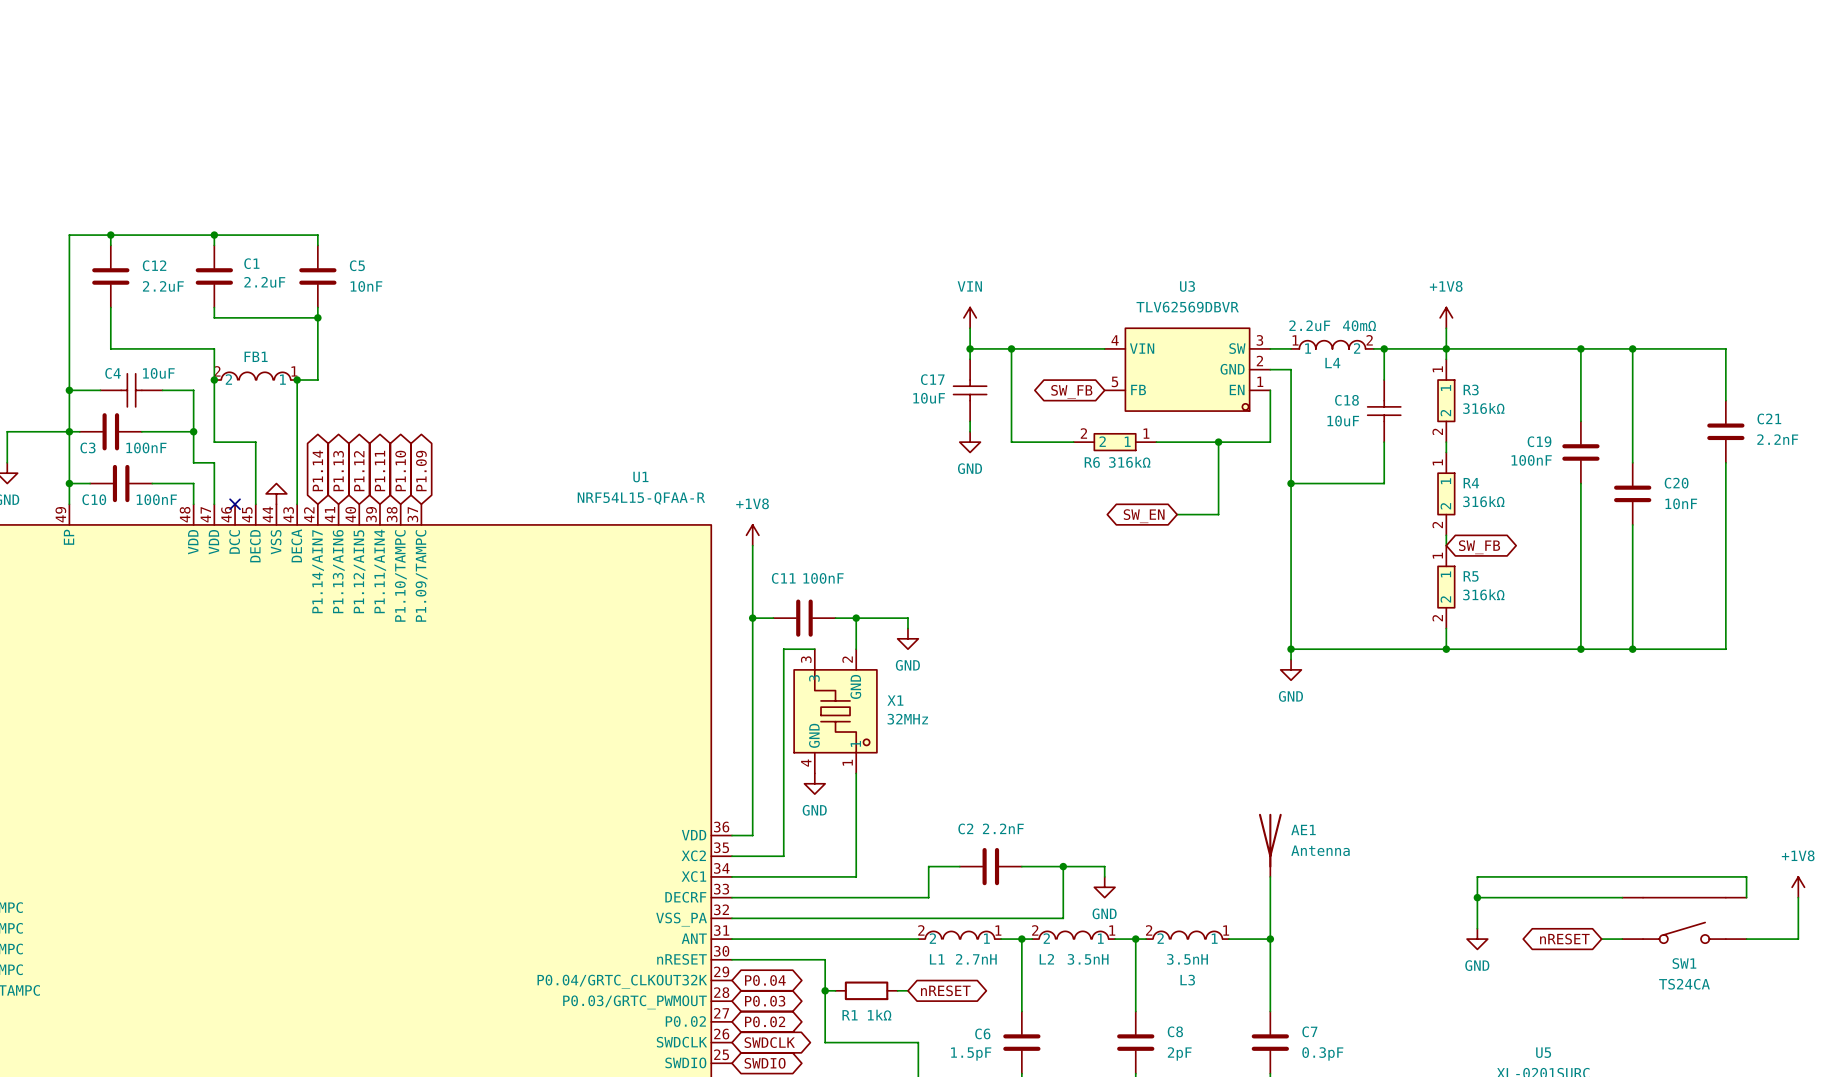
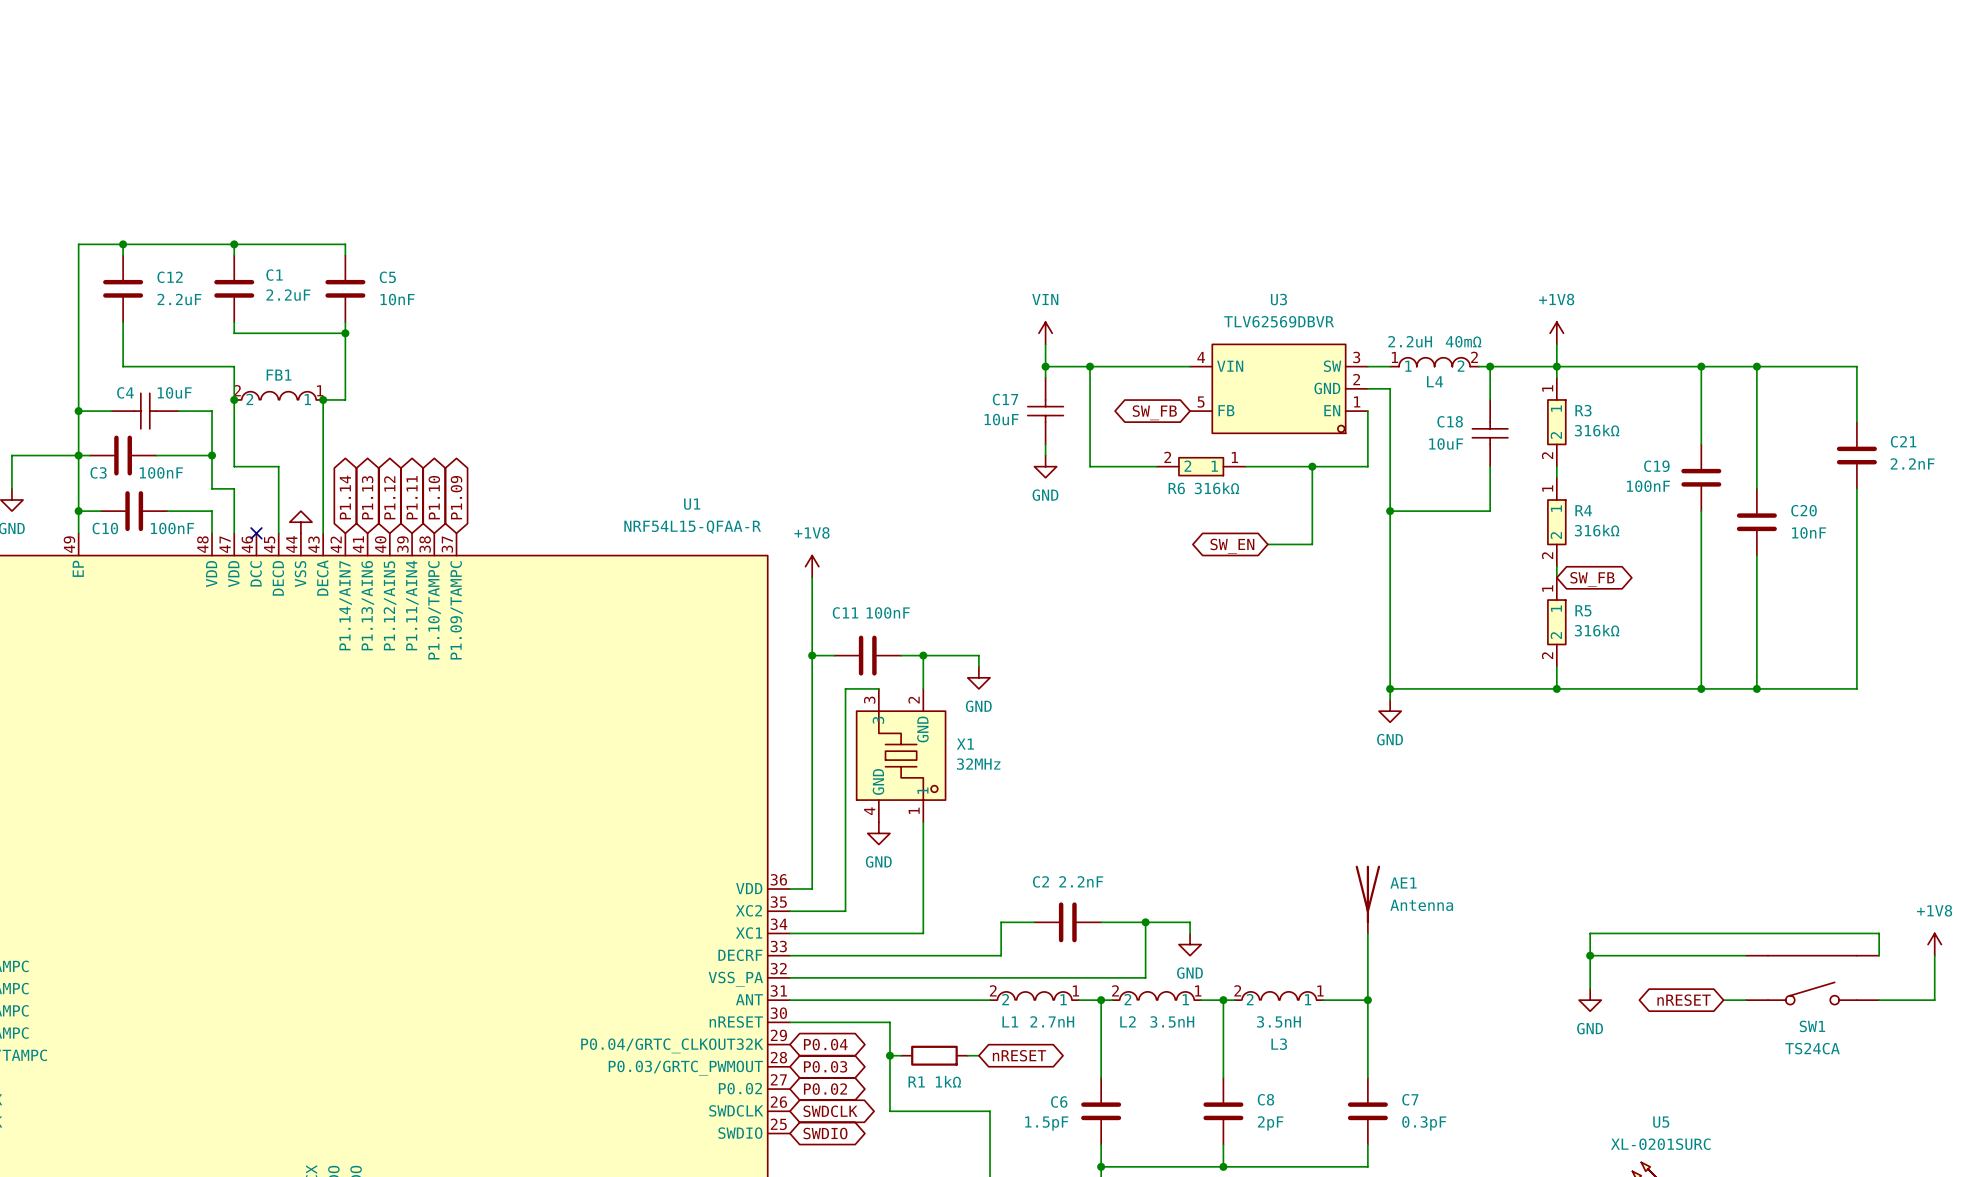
L4 value: 2.2uF (1309, 325) -> 2.2uH (1410, 341)

